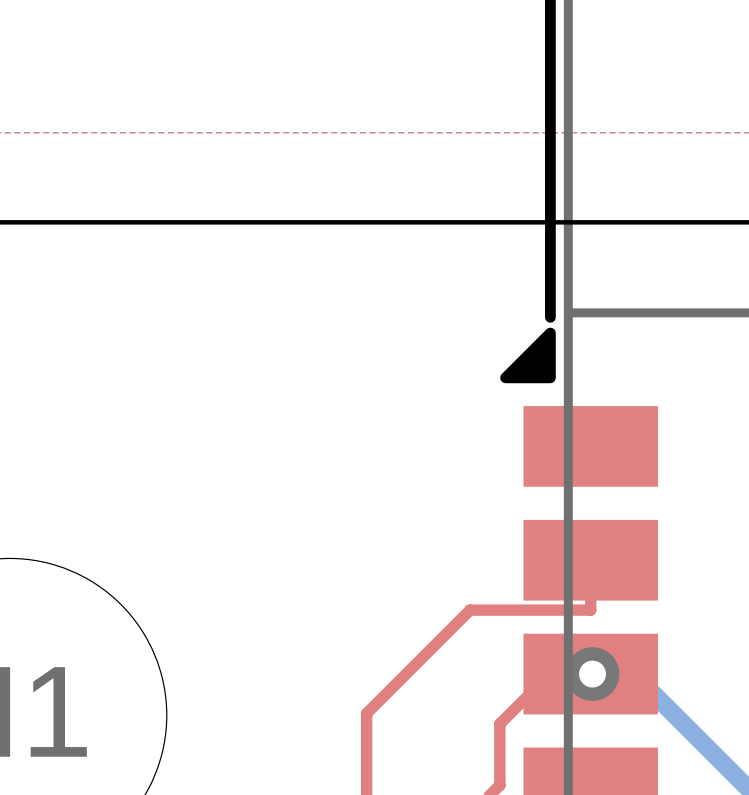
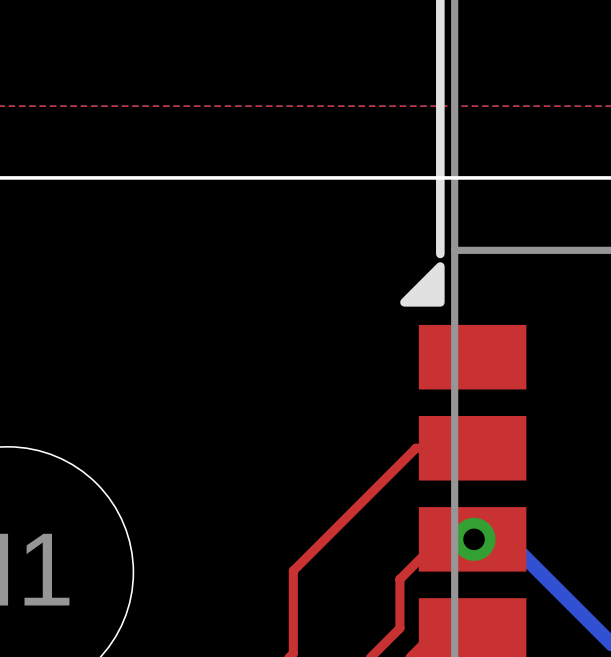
top track: (590, 560) (590, 610) (470, 610) -> (472, 448) (415, 448) (376, 488)

